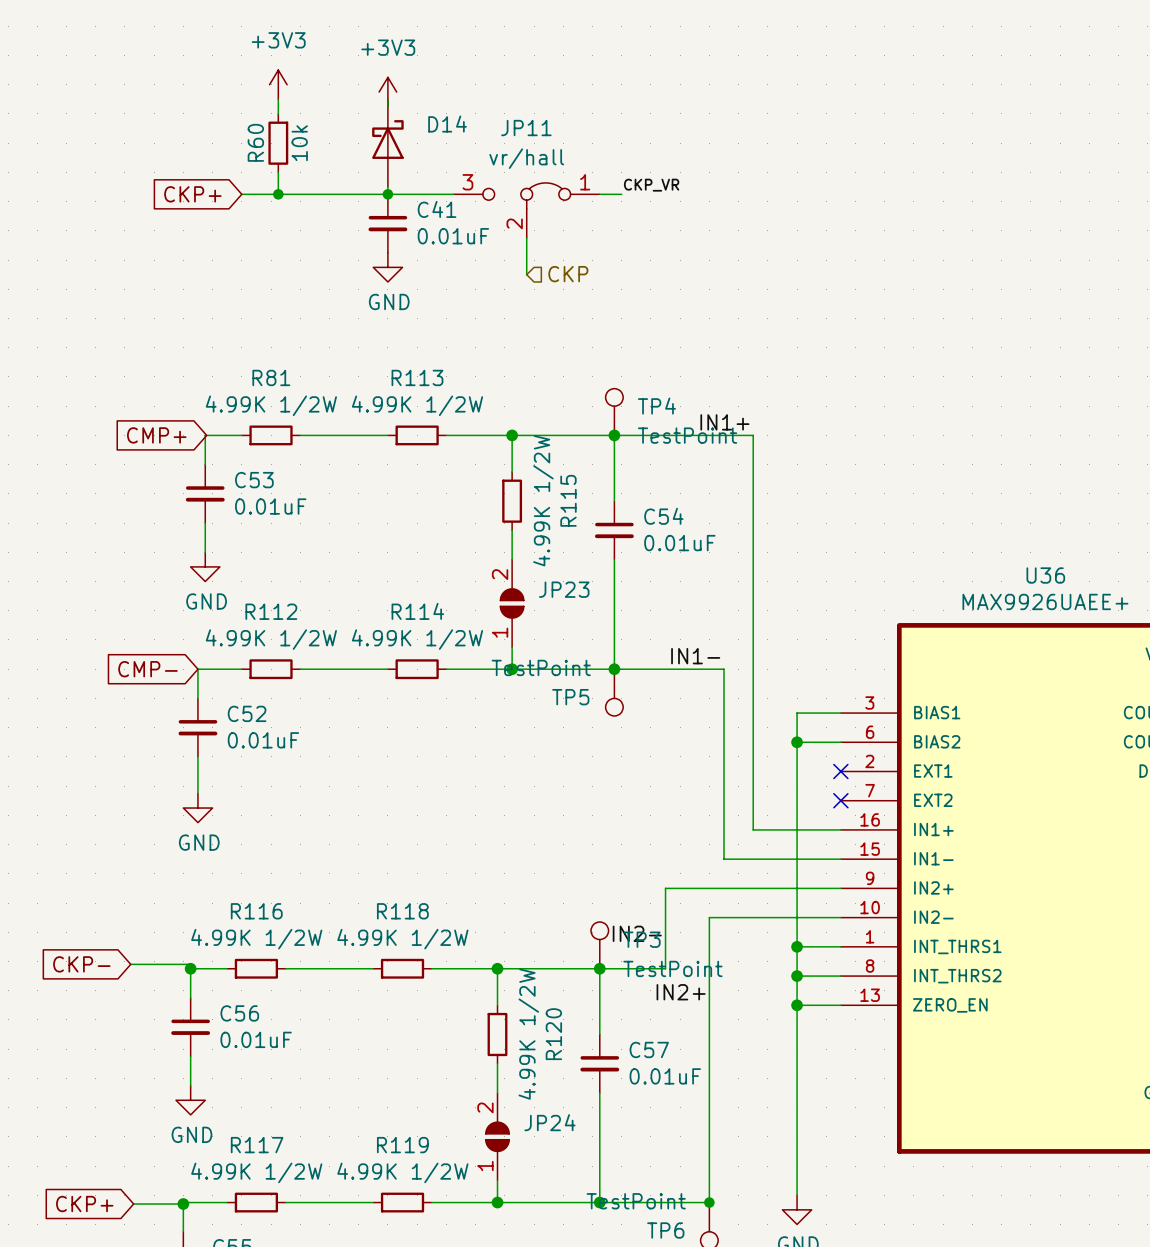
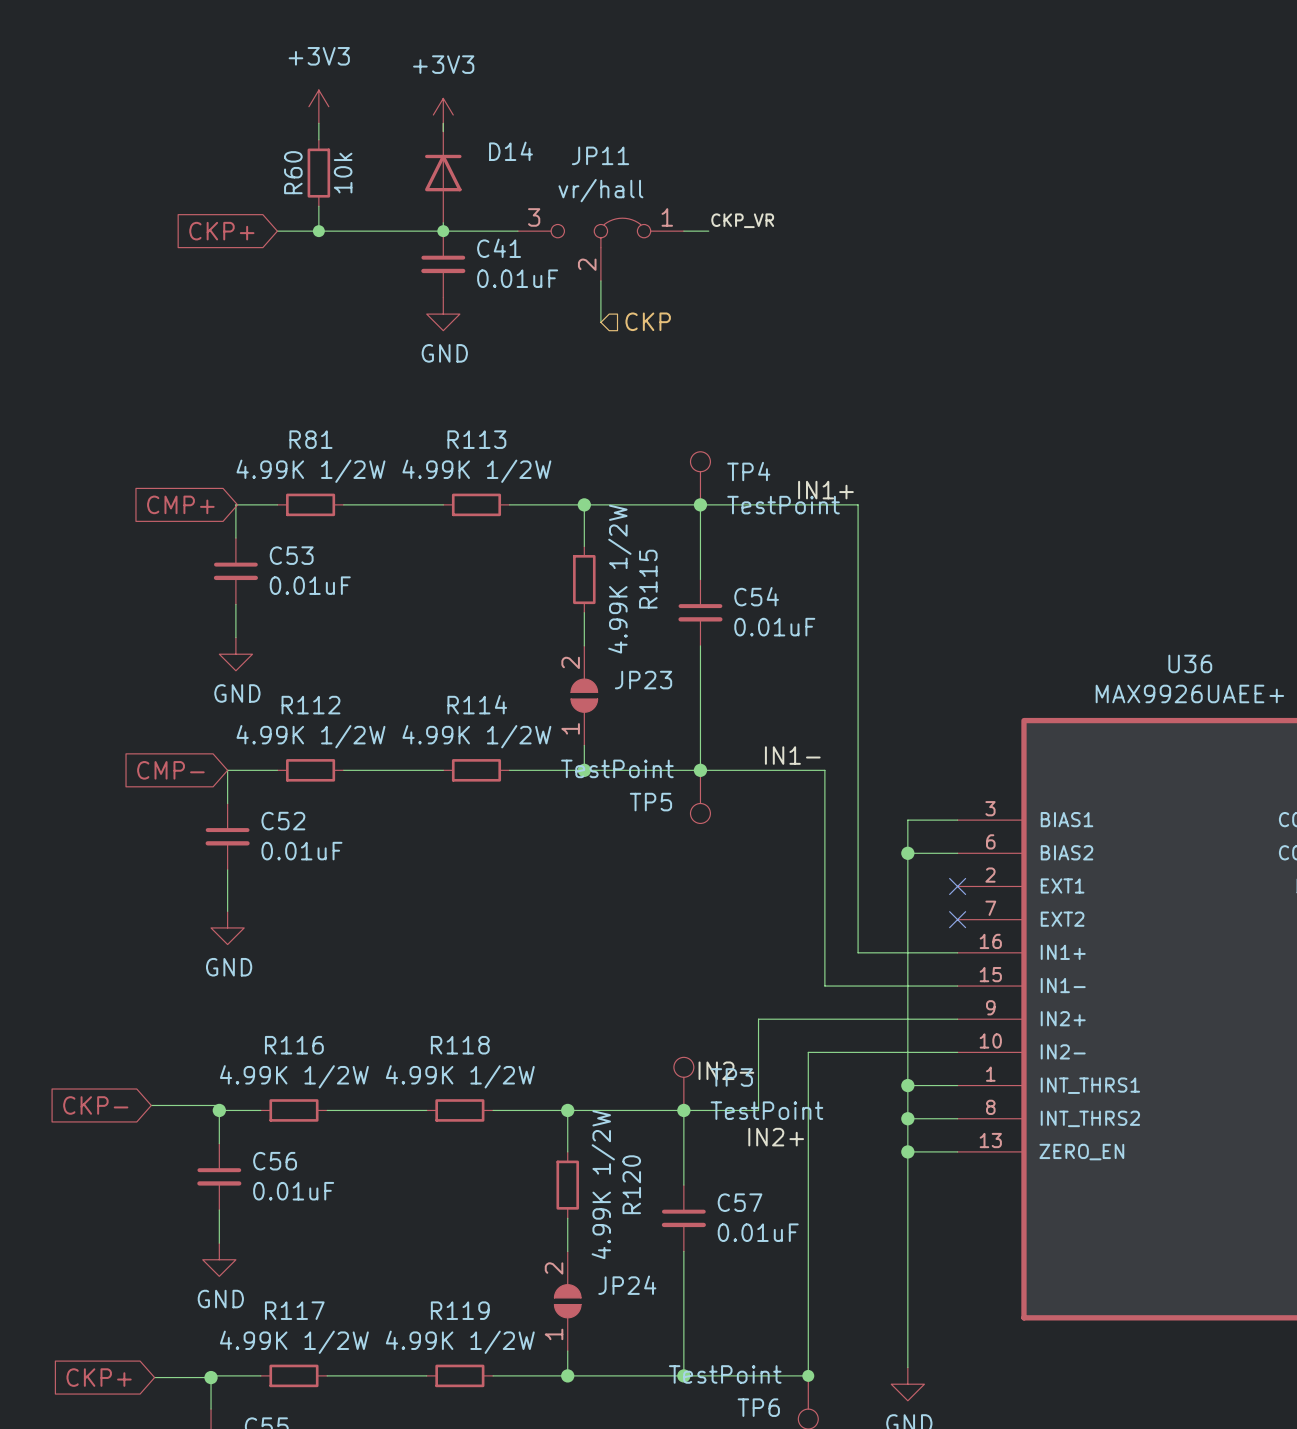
D14 symbol: [372, 99, 404, 188] -> [425, 123, 462, 223]

